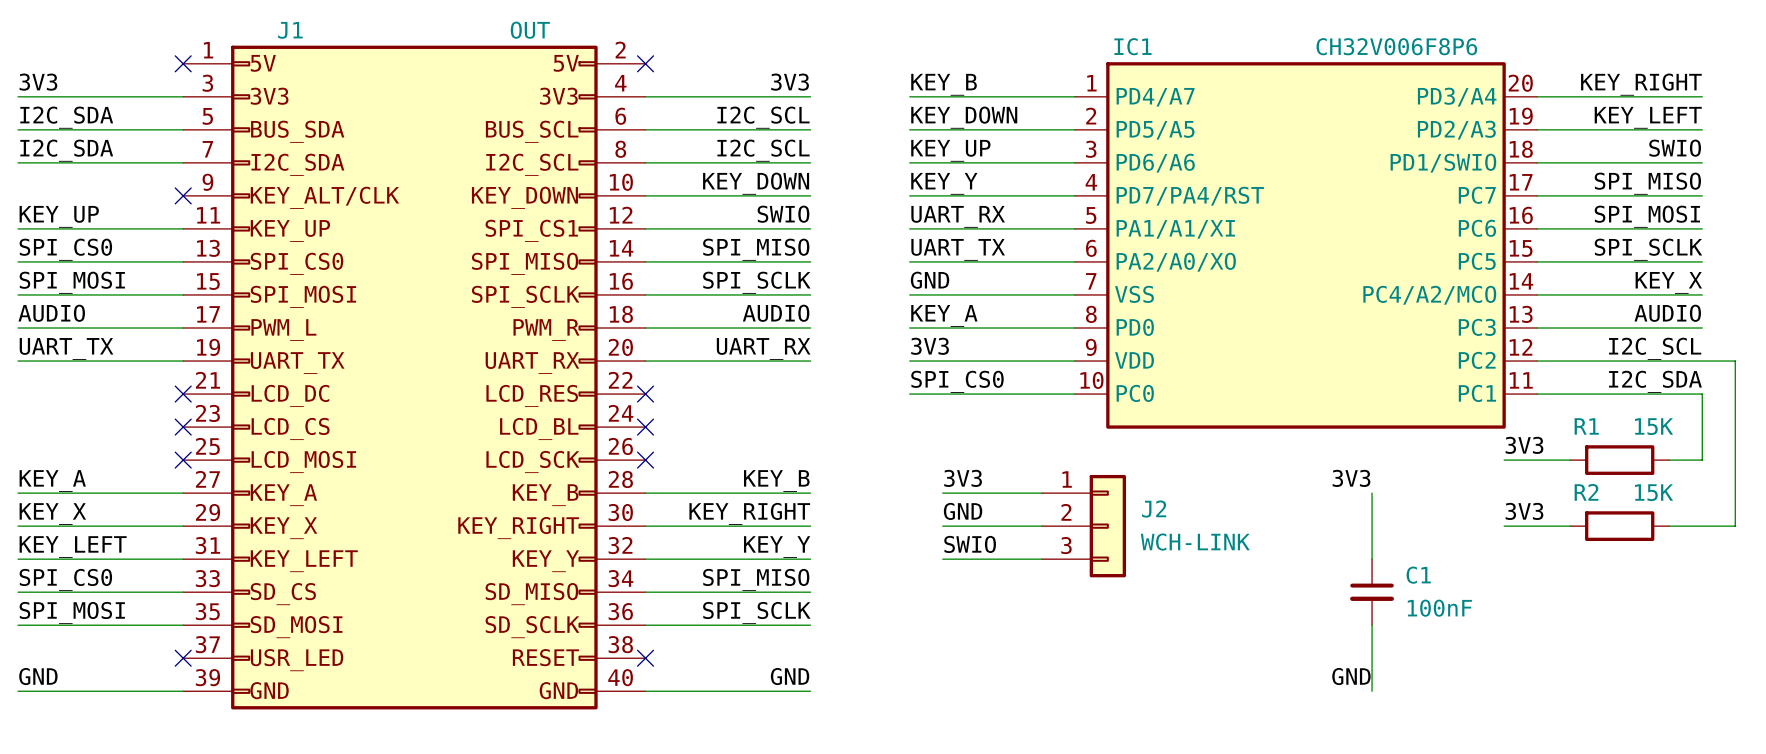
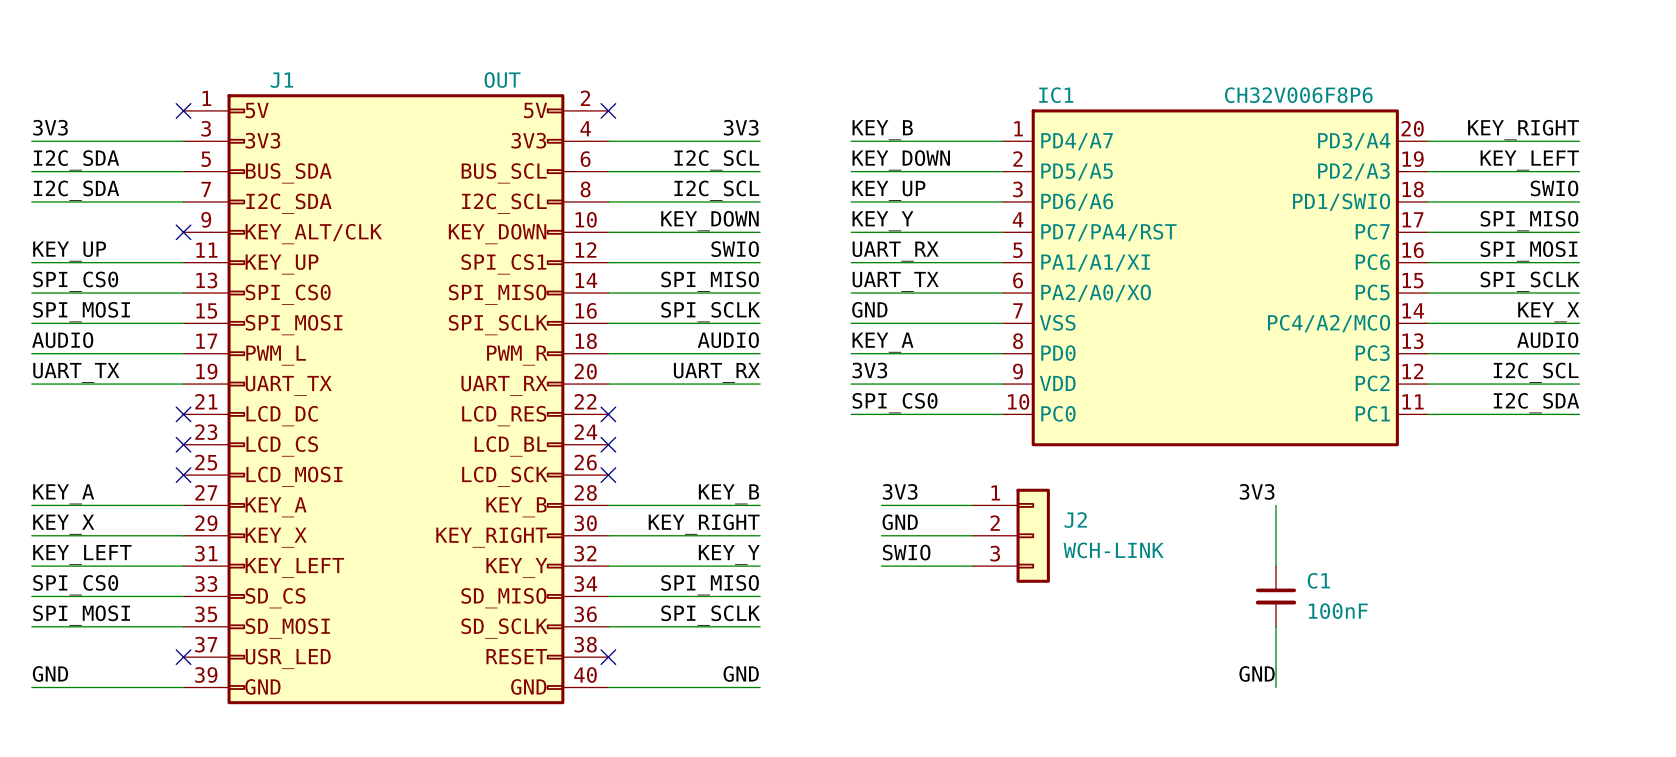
wire: (1702, 361) (1735, 361) (1735, 526) (1669, 526) -> none
wire: (1702, 394) (1702, 460) (1669, 460) -> none
label: 3V3 (1524, 445) -> none
wire: (1504, 460) (1570, 460) -> none
R1: 15K (1619, 460) -> none
label: 3V3 (1524, 511) -> none
wire: (1504, 526) (1570, 526) -> none
R2: 15K (1619, 526) -> none

